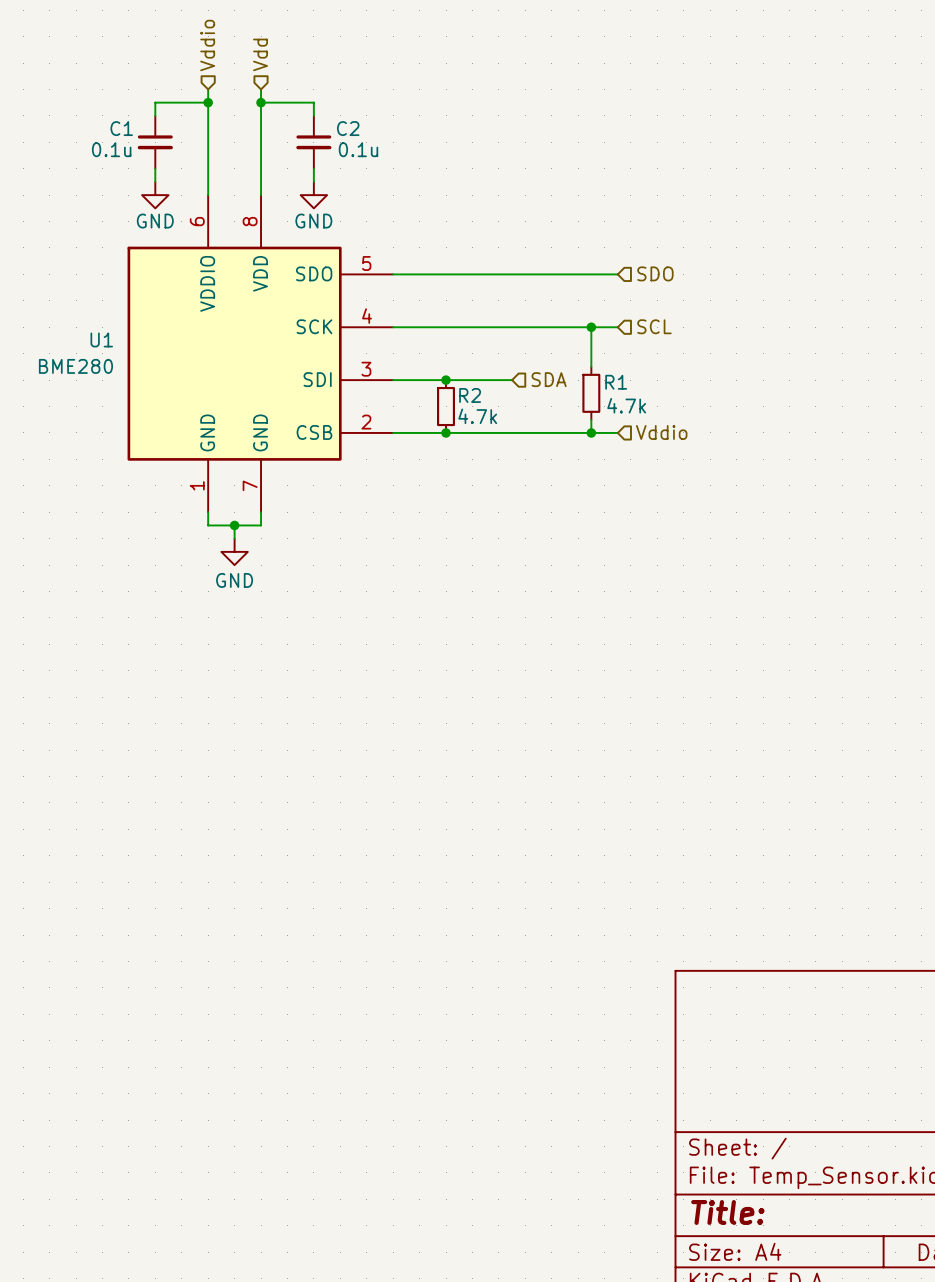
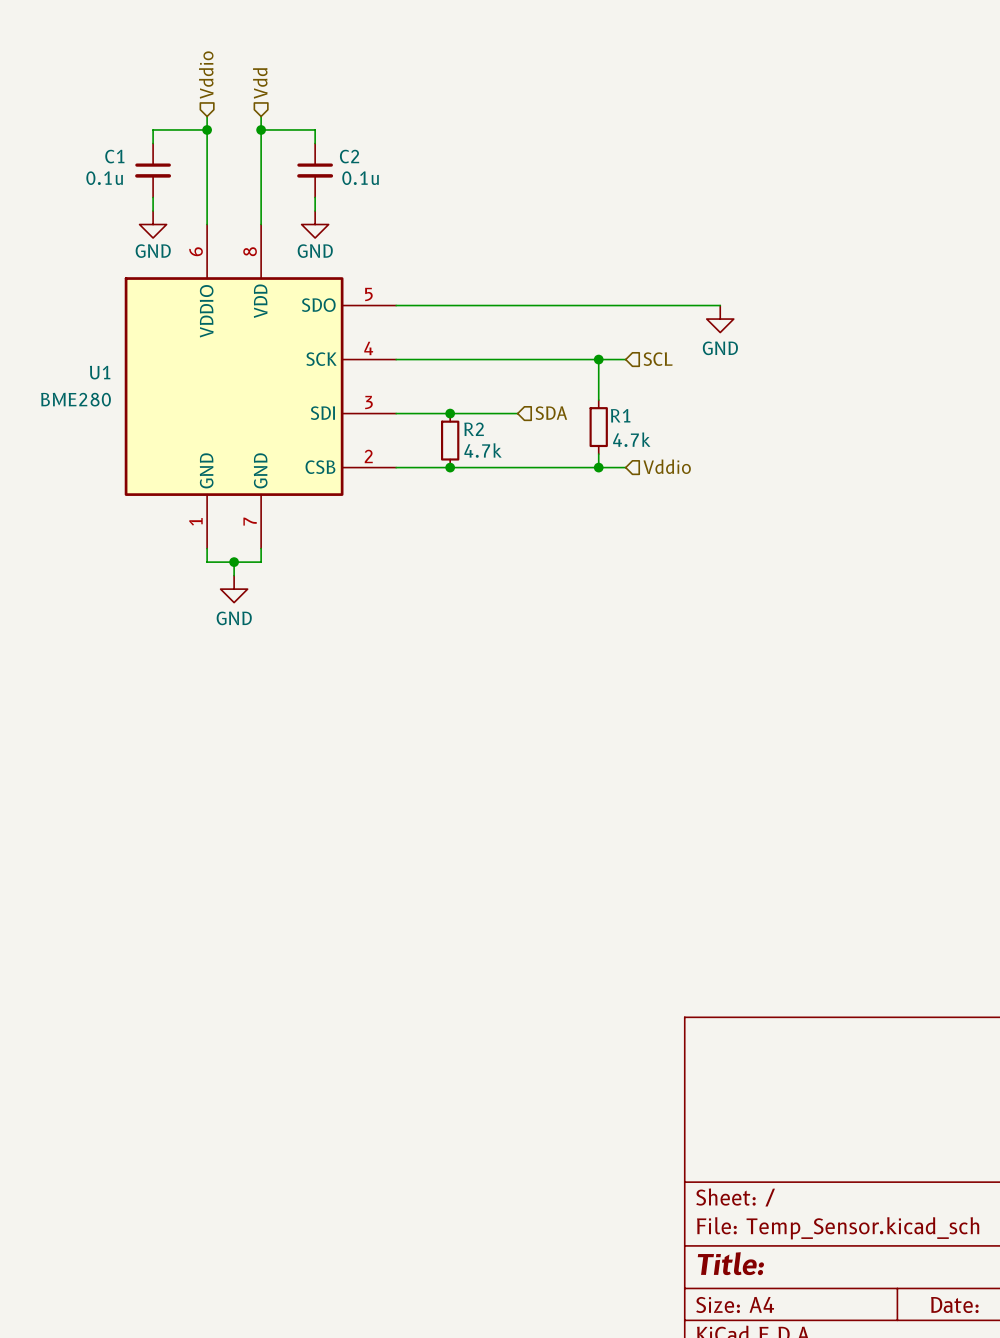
hierarchical label: SDO (655, 273) -> none
wire: none -> (625, 305) (720, 305)
power symbol: none -> GND (720, 319)

